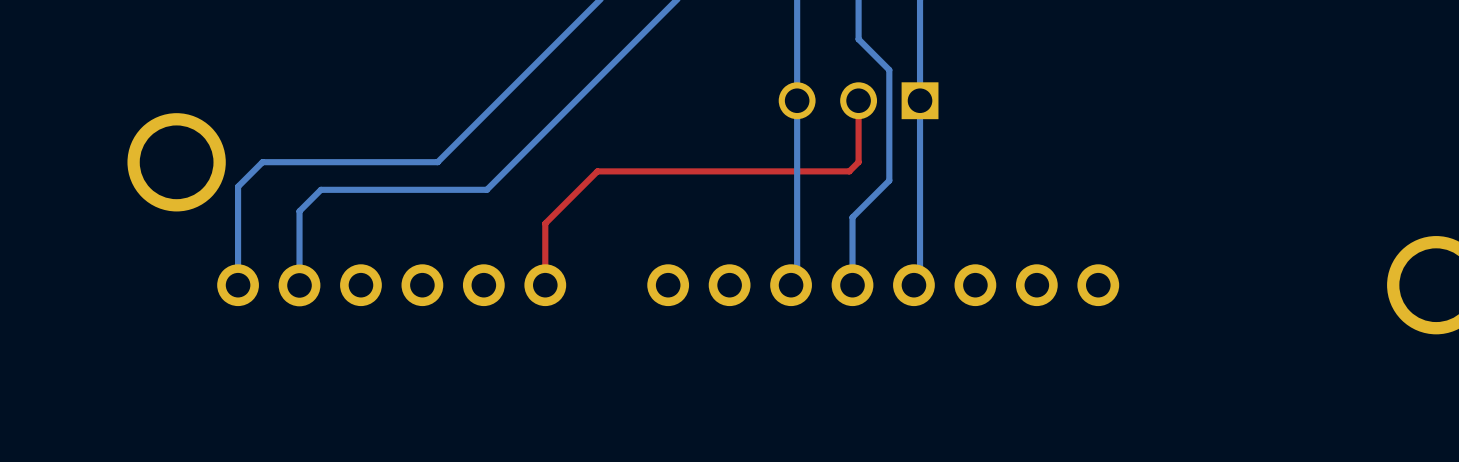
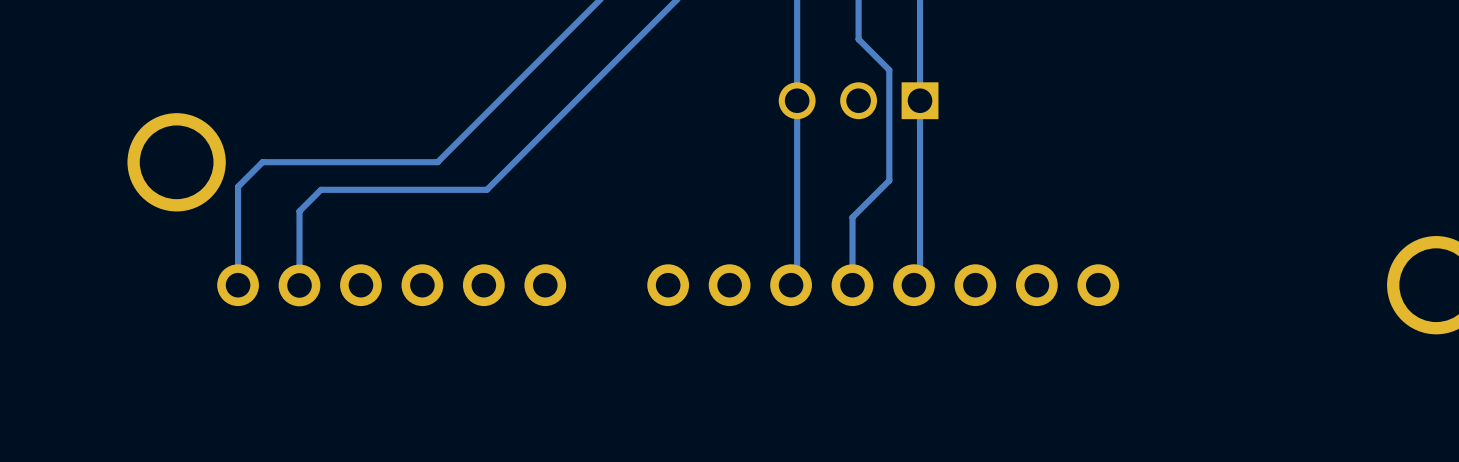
top track: (858, 100) (858, 162) (849, 171) (597, 171) (545, 223) (545, 285) -> none

